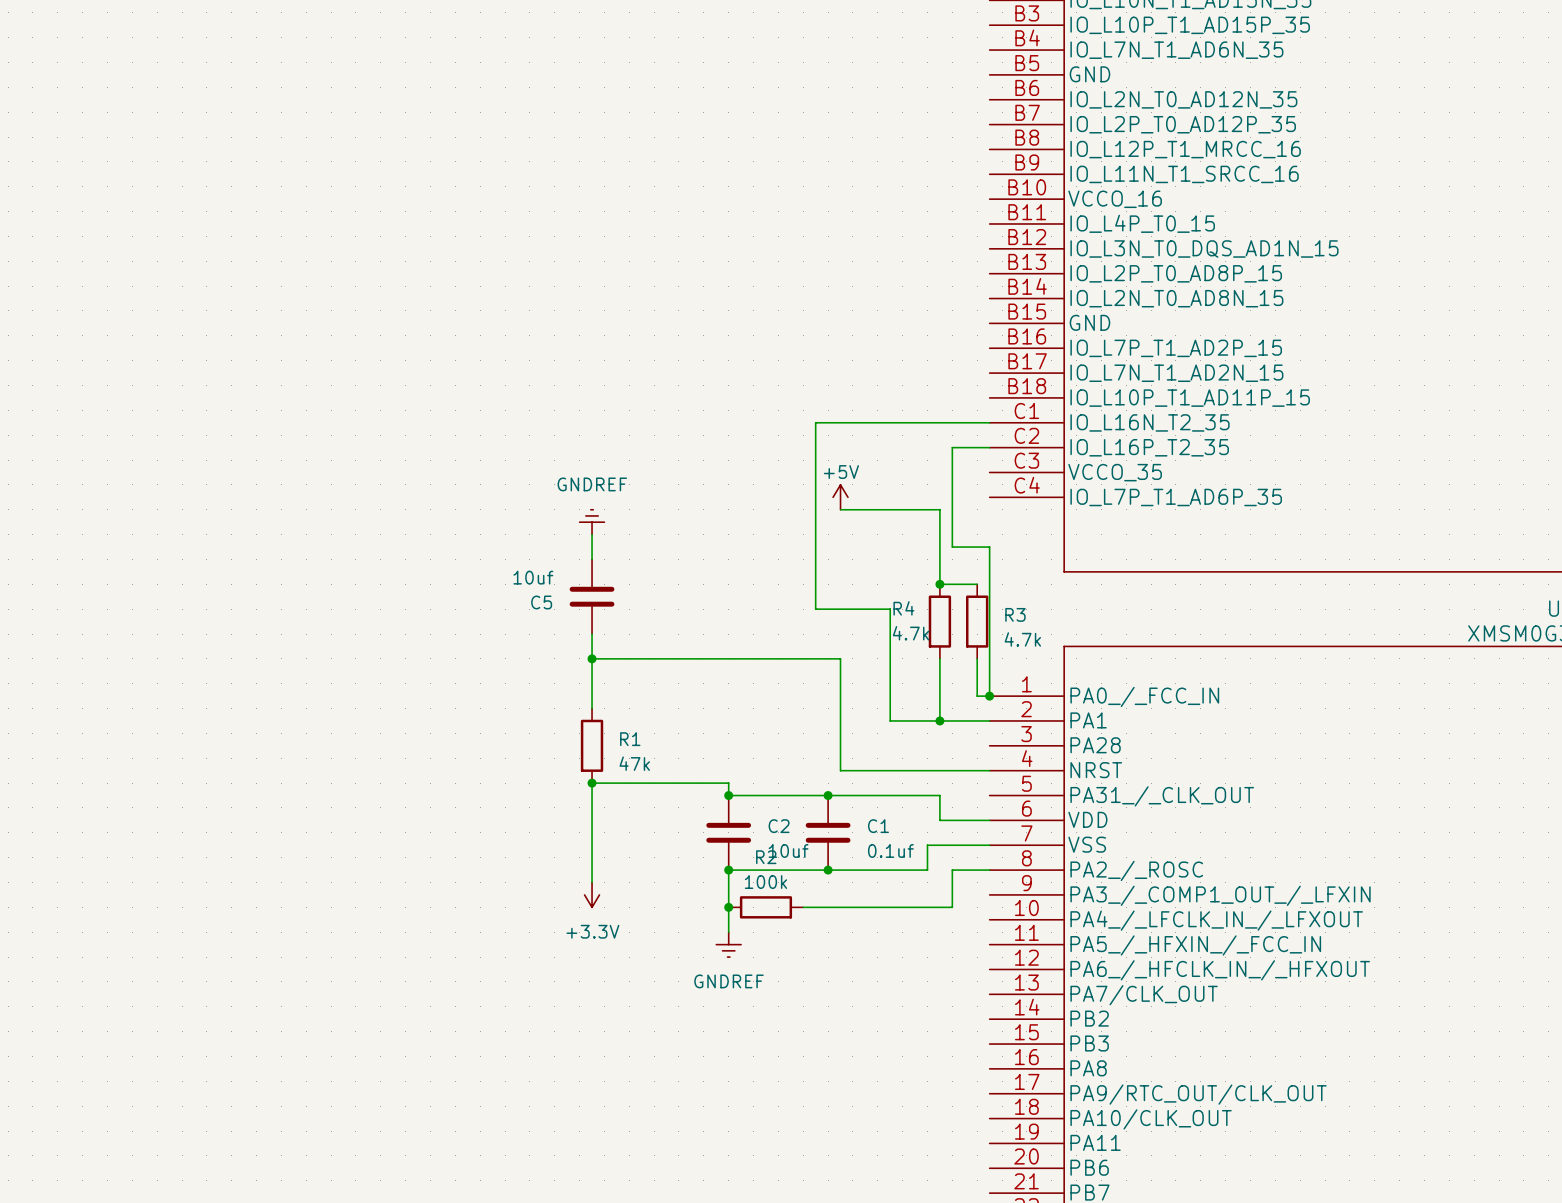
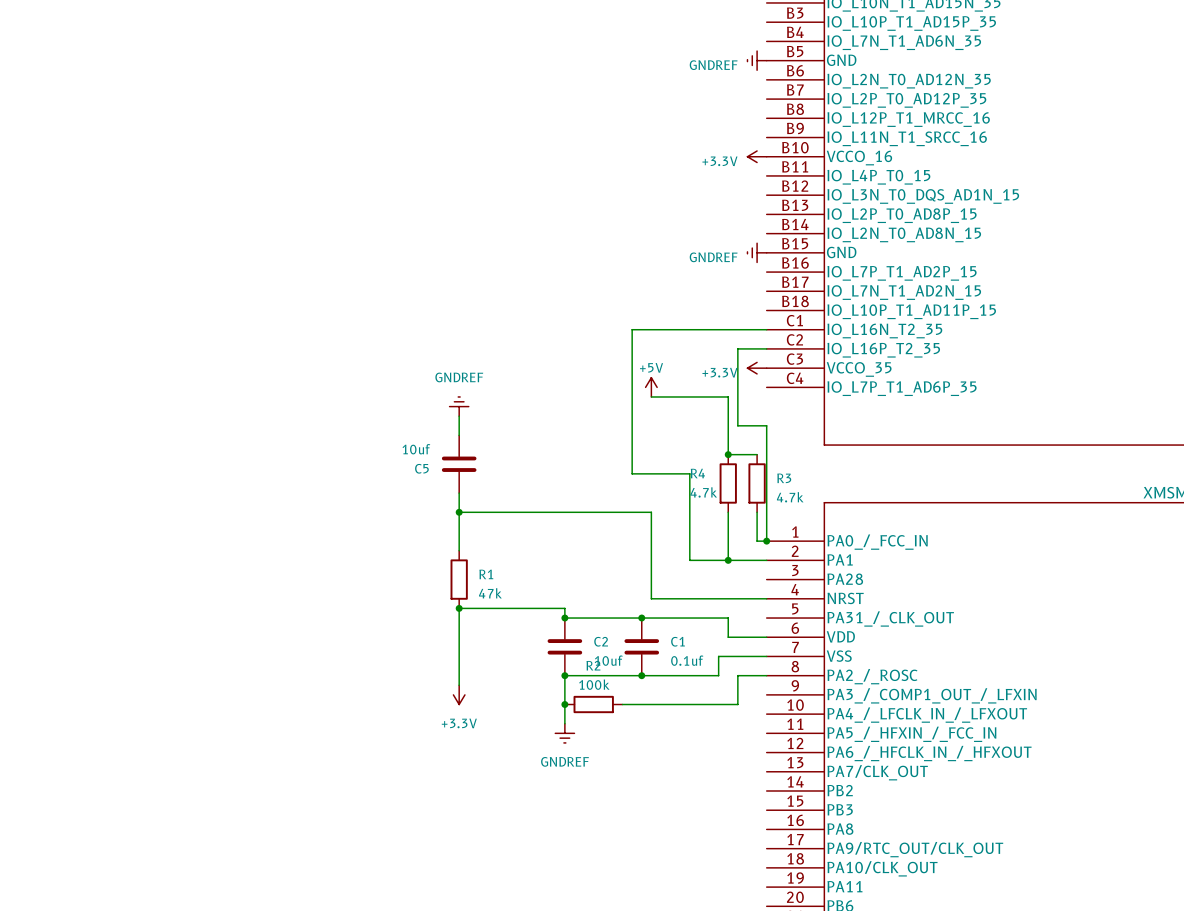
power symbol: none -> GNDREF (757, 60)
power symbol: none -> +3.3V (757, 156)
power symbol: none -> GNDREF (757, 252)
power symbol: none -> +3.3V (757, 368)

